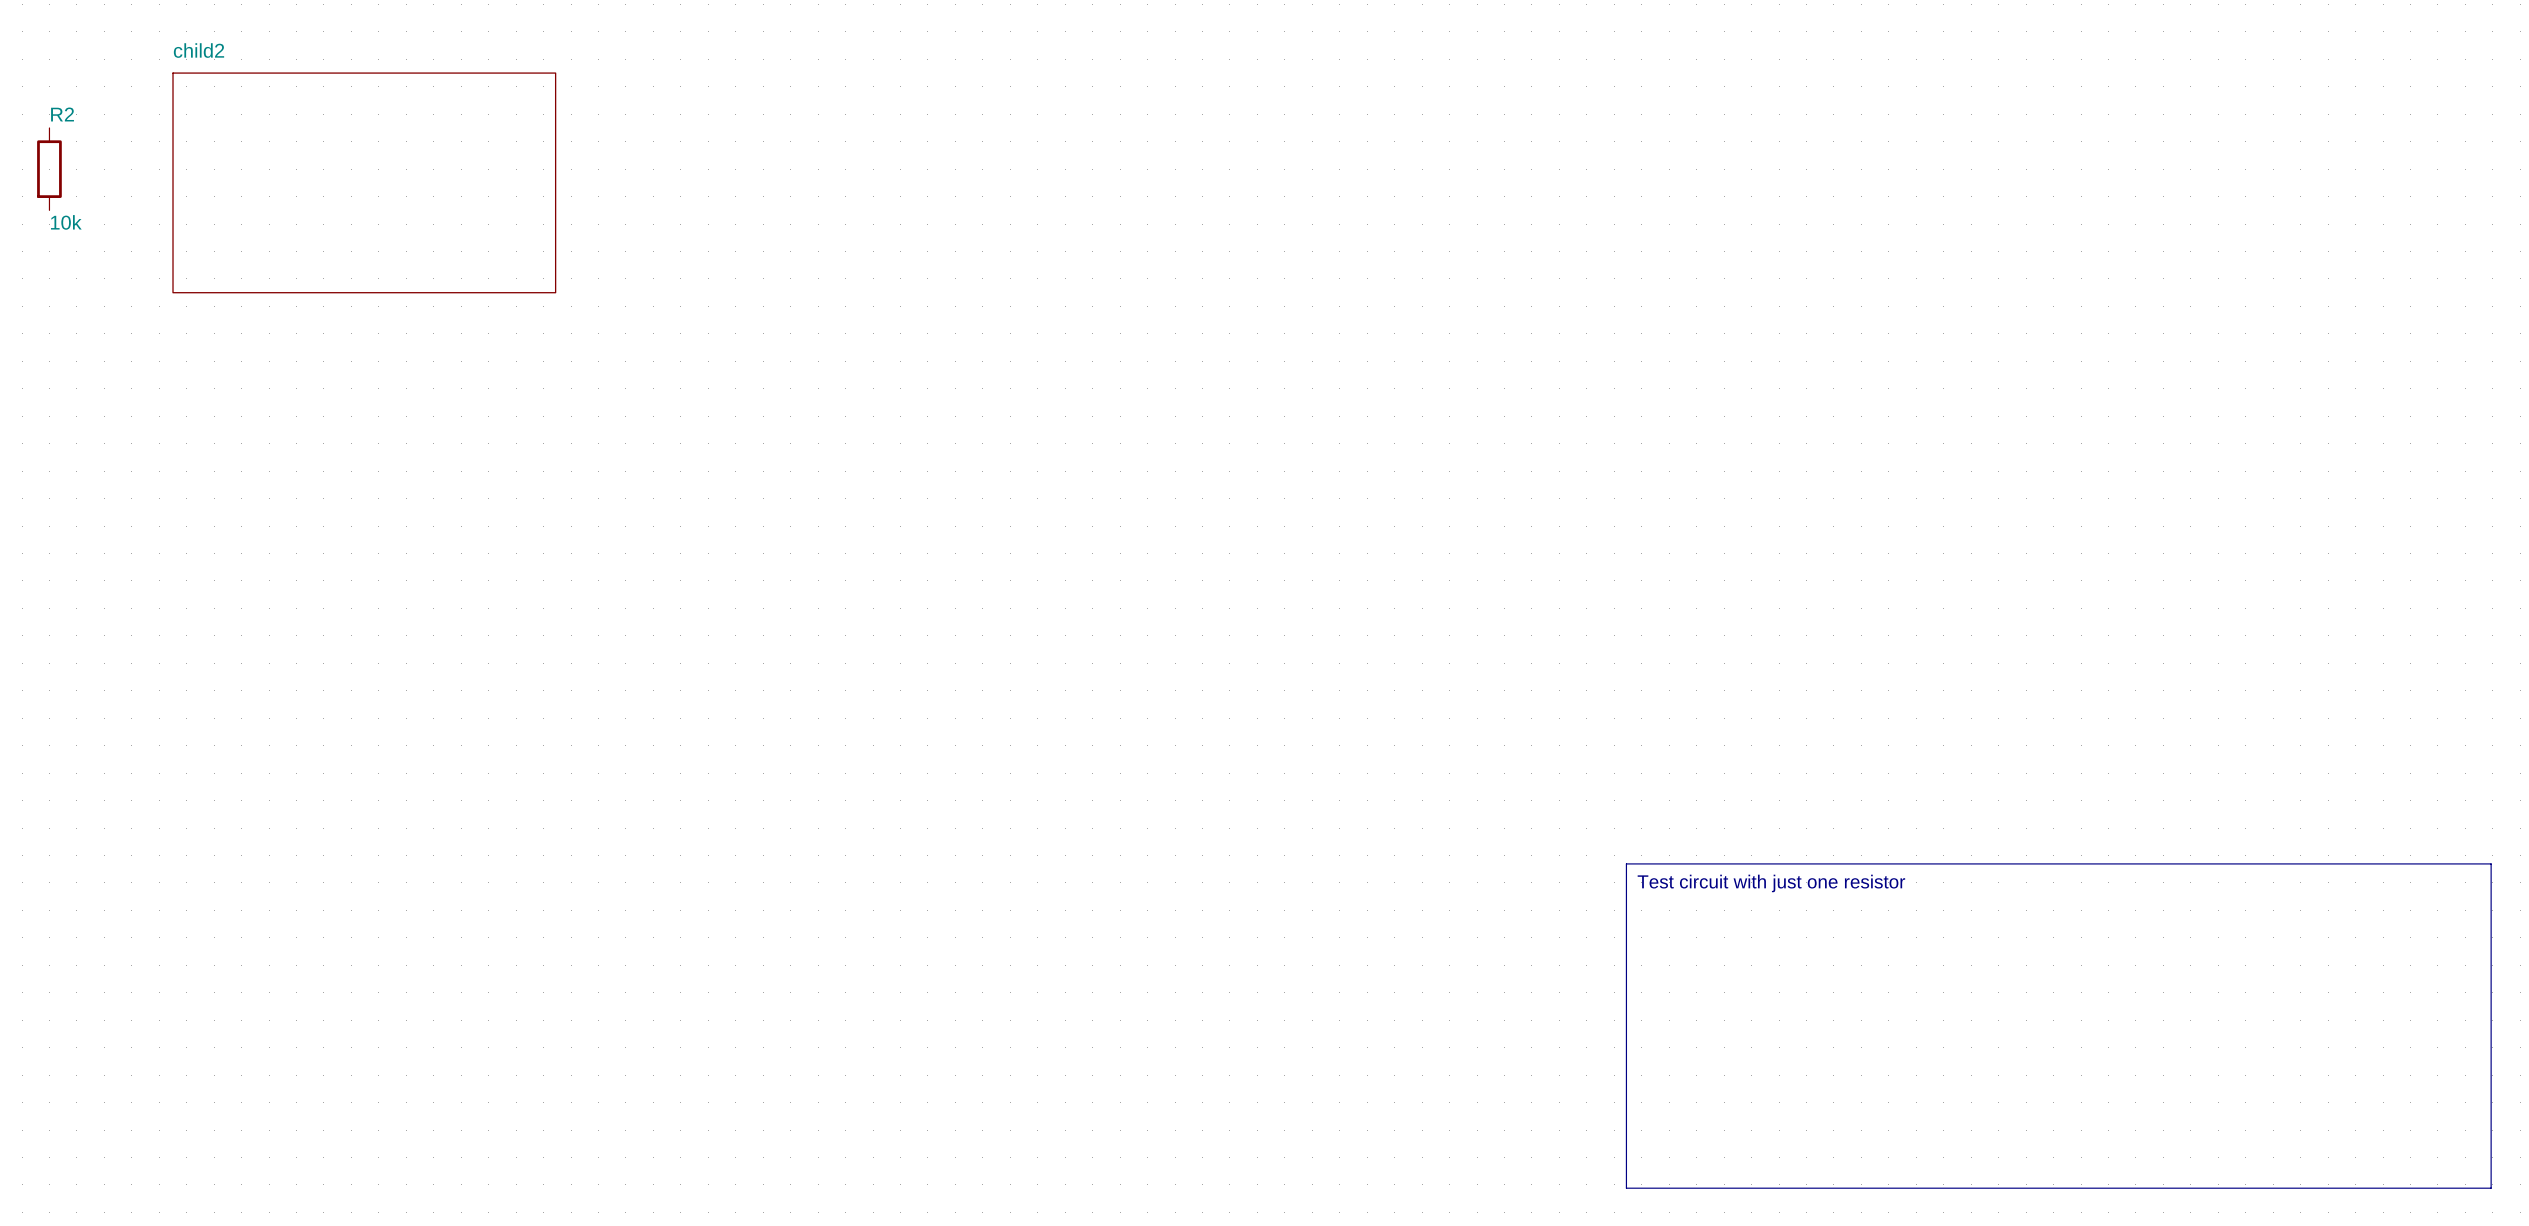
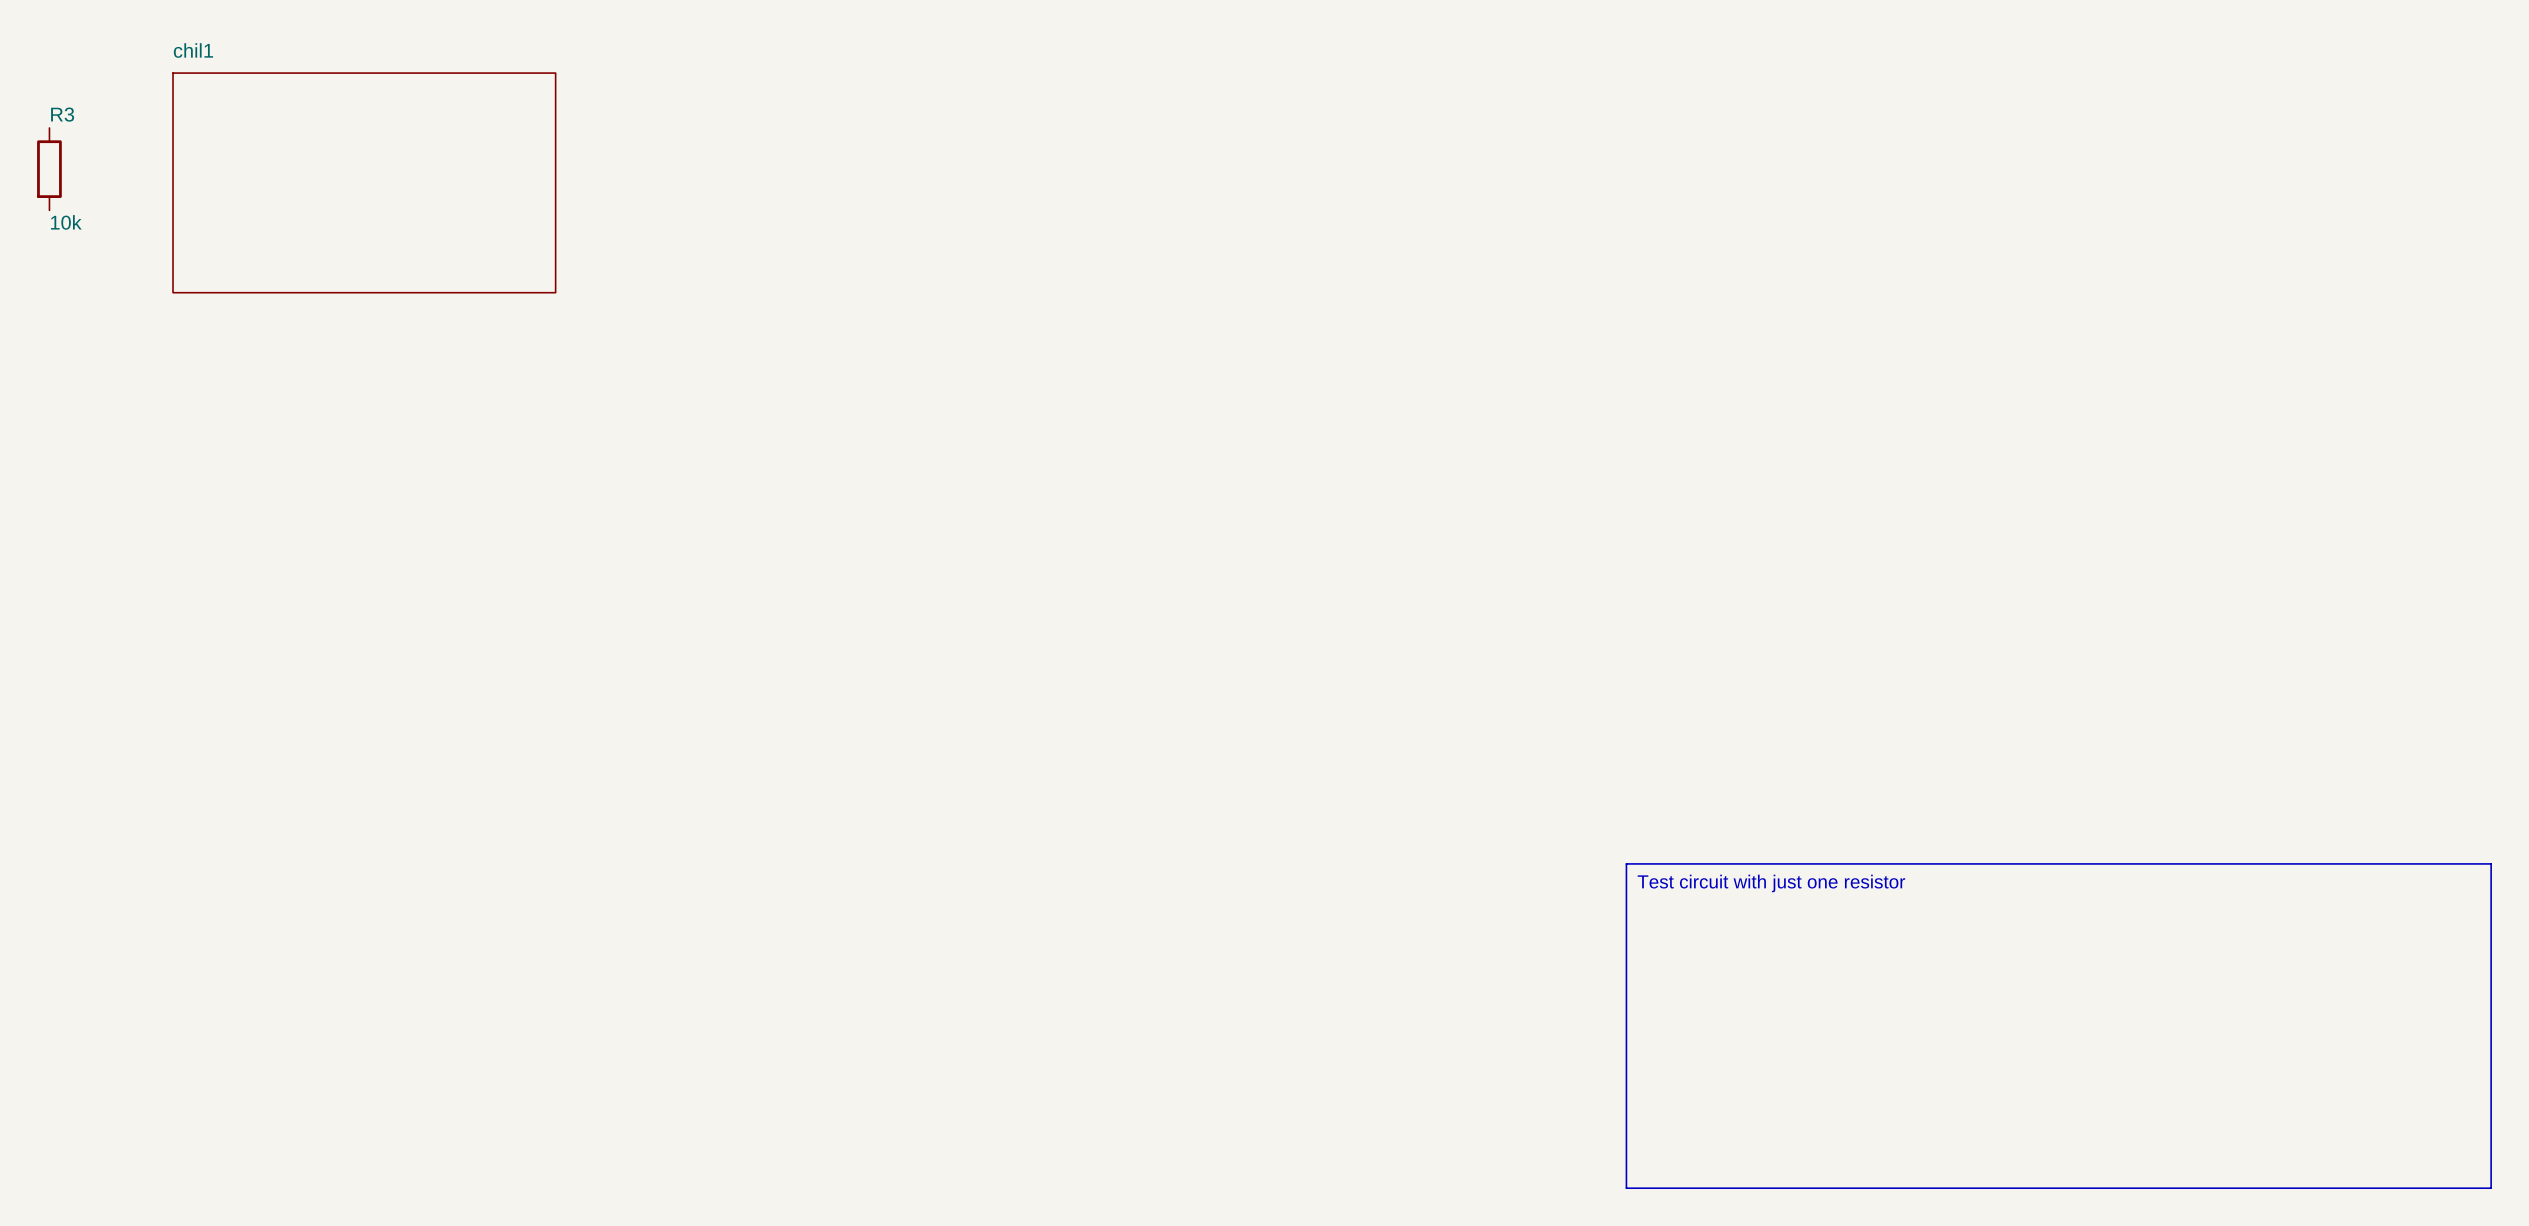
sheet child2 name: child2 (198, 50) -> chil1 (193, 50)
R2 name: R2 (62, 114) -> R3 (62, 114)

